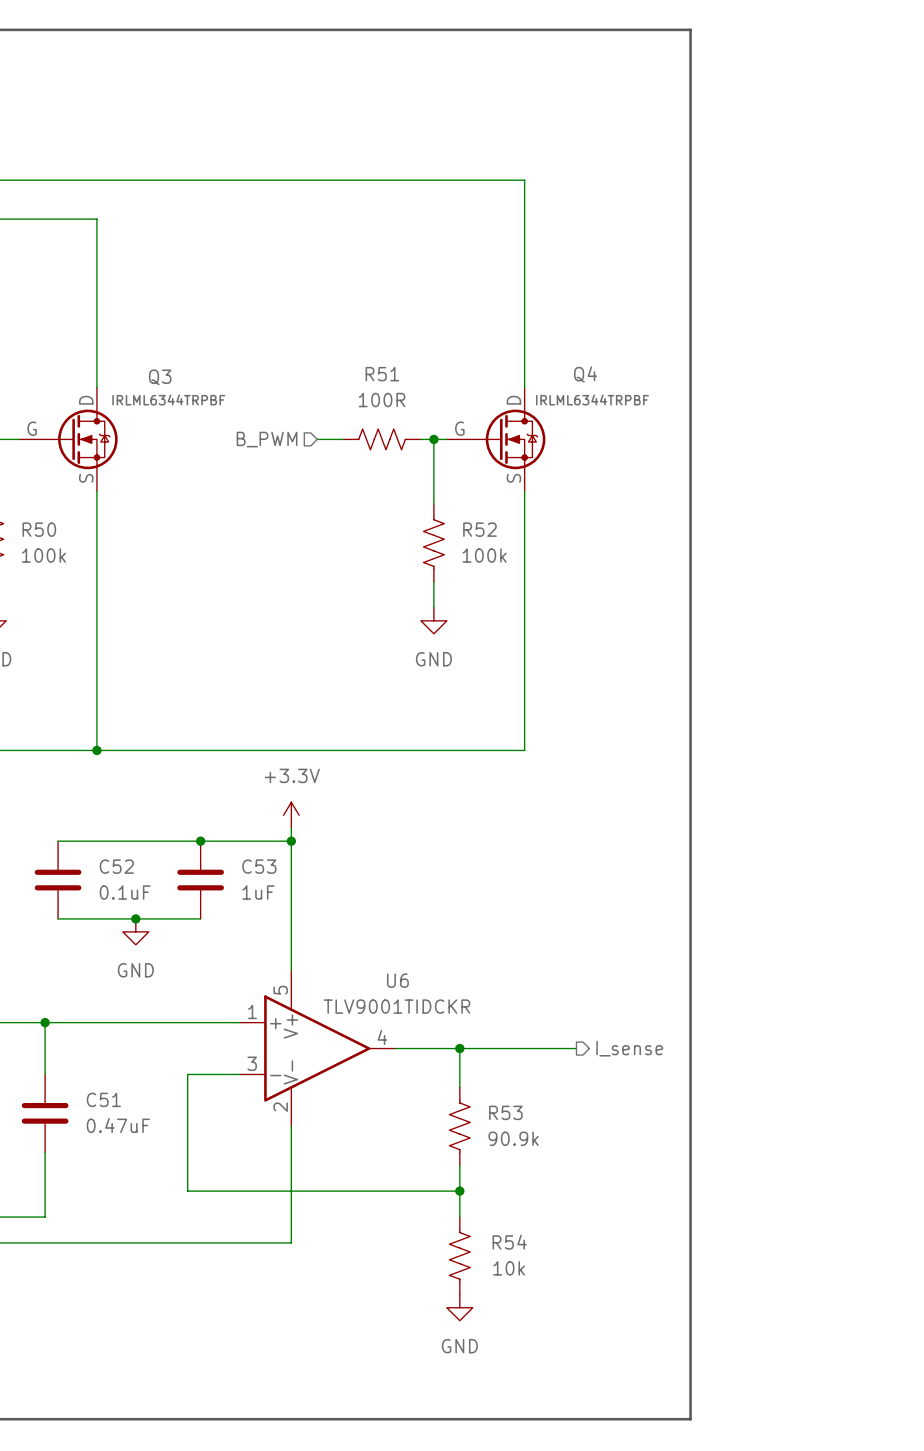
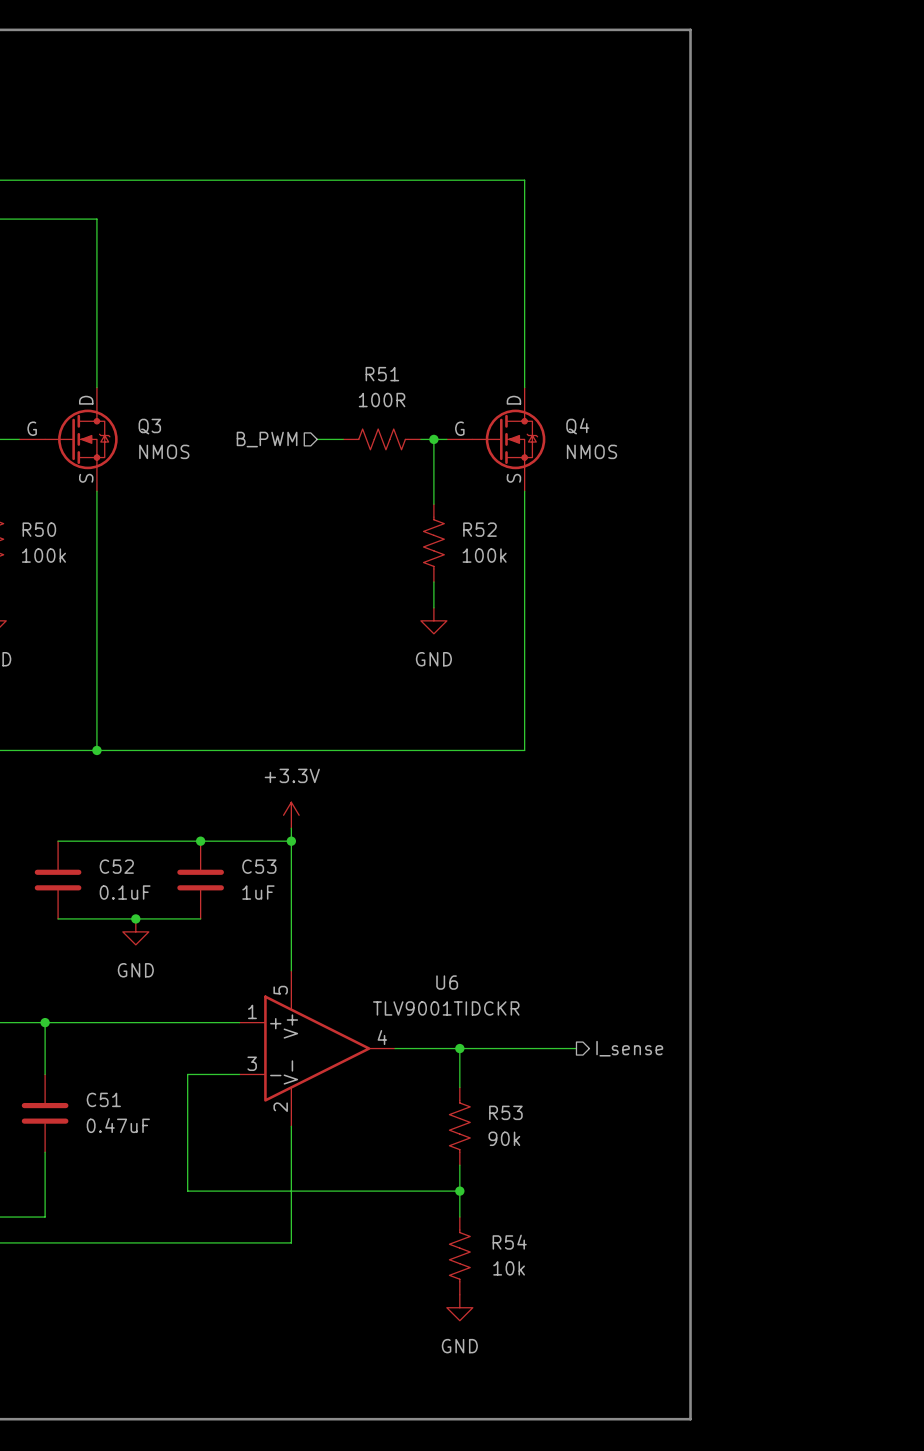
Q4 name position: Q4 (585, 374) -> Q4 (577, 426)
Q3 name position: Q3 (160, 377) -> Q3 (149, 426)
Q3 text: IRLML6344TRPBF (168, 399) -> none
Q4 text: IRLML6344TRPBF (592, 399) -> none
Q3 value: none -> NMOS (164, 451)
Q4 value: none -> NMOS (592, 451)
U6 name position: U6 (397, 980) -> U6 (447, 982)
U6 value position: TLV9001TIDCKR (397, 1006) -> TLV9001TIDCKR (446, 1008)
R53 value: 90.9k (513, 1138) -> 90k (504, 1138)

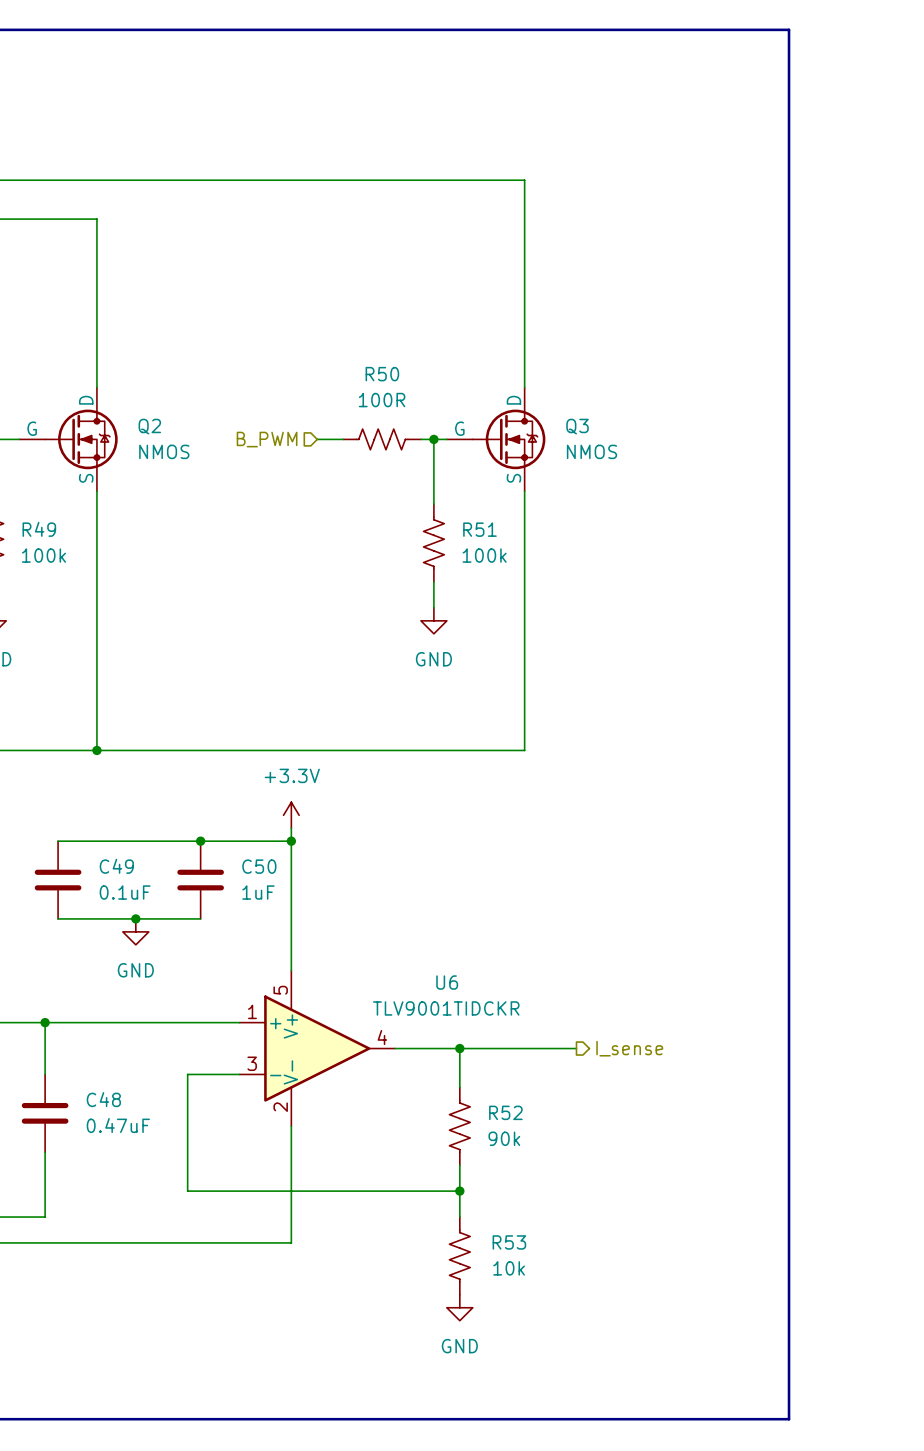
line: (690, 29) (690, 1419) -> (690, 29) (789, 29) (789, 1419) (690, 1419)
R51 name: R51 (382, 374) -> R50 (382, 374)
Q3 name: Q3 (149, 426) -> Q2 (149, 426)
Q4 name: Q4 (577, 426) -> Q3 (577, 426)
R50 name: R50 (39, 529) -> R49 (39, 529)
R52 name: R52 (479, 529) -> R51 (479, 529)
C52 name: C52 (116, 866) -> C49 (116, 866)
C53 name: C53 (259, 866) -> C50 (259, 866)
C51 name: C51 (103, 1099) -> C48 (103, 1099)
R53 name: R53 (505, 1112) -> R52 (505, 1112)
R54 name: R54 (509, 1242) -> R53 (509, 1242)

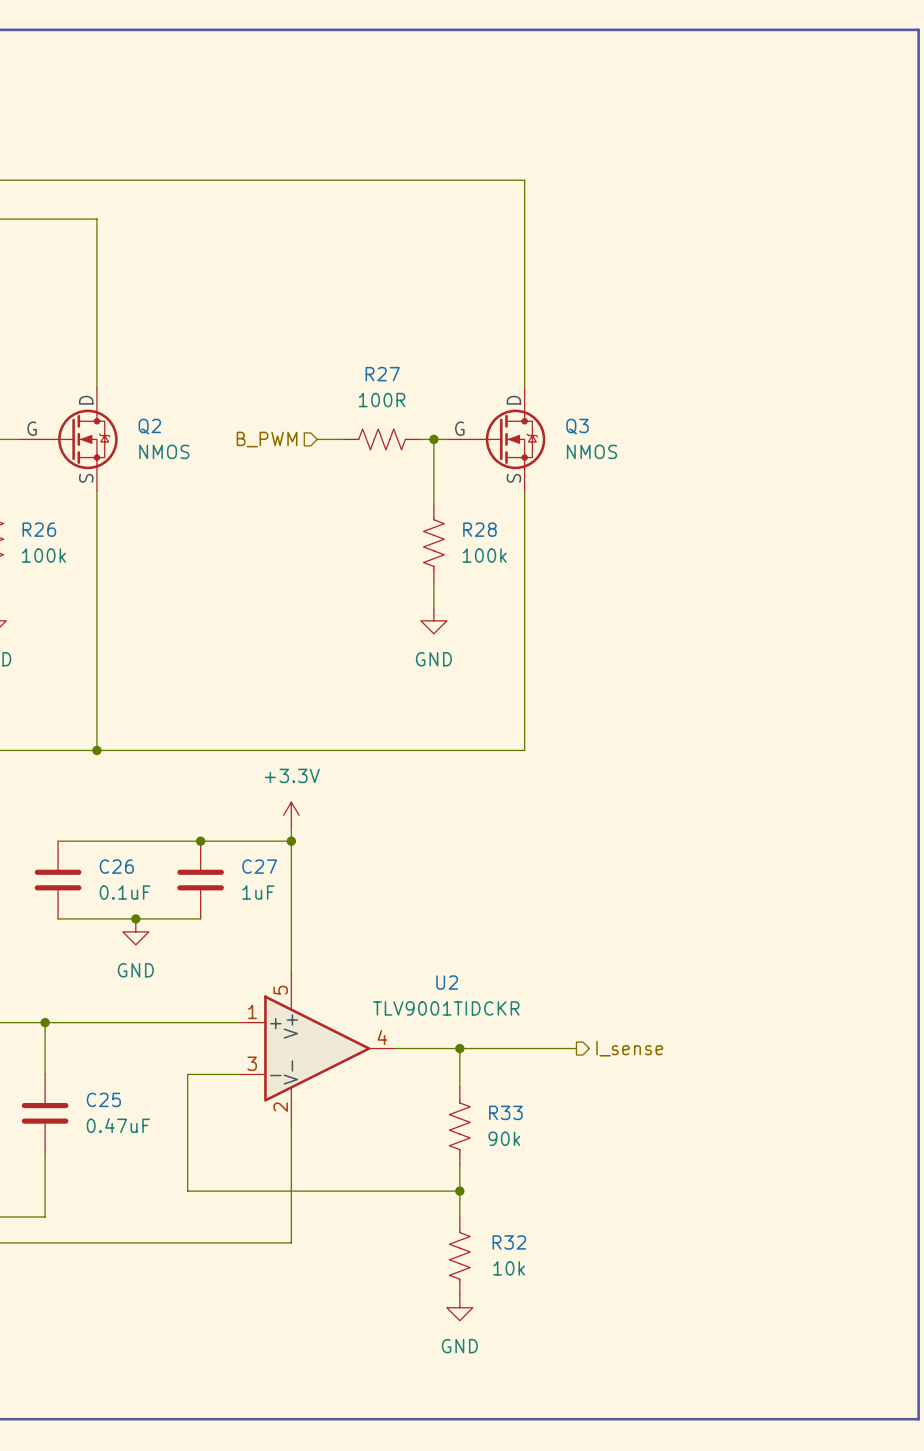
line: (789, 29) (789, 1419) -> (789, 29) (918, 29) (918, 1419) (789, 1419)
R50 name: R50 (382, 374) -> R27 (382, 374)
R49 name: R49 (39, 529) -> R26 (39, 529)
R51 name: R51 (479, 529) -> R28 (479, 529)
C49 name: C49 (116, 866) -> C26 (116, 866)
C50 name: C50 (259, 866) -> C27 (259, 866)
U6 name: U6 (447, 982) -> U2 (447, 982)
C48 name: C48 (103, 1099) -> C25 (103, 1099)
R52 name: R52 (505, 1112) -> R33 (505, 1112)
R53 name: R53 (509, 1242) -> R32 (509, 1242)

